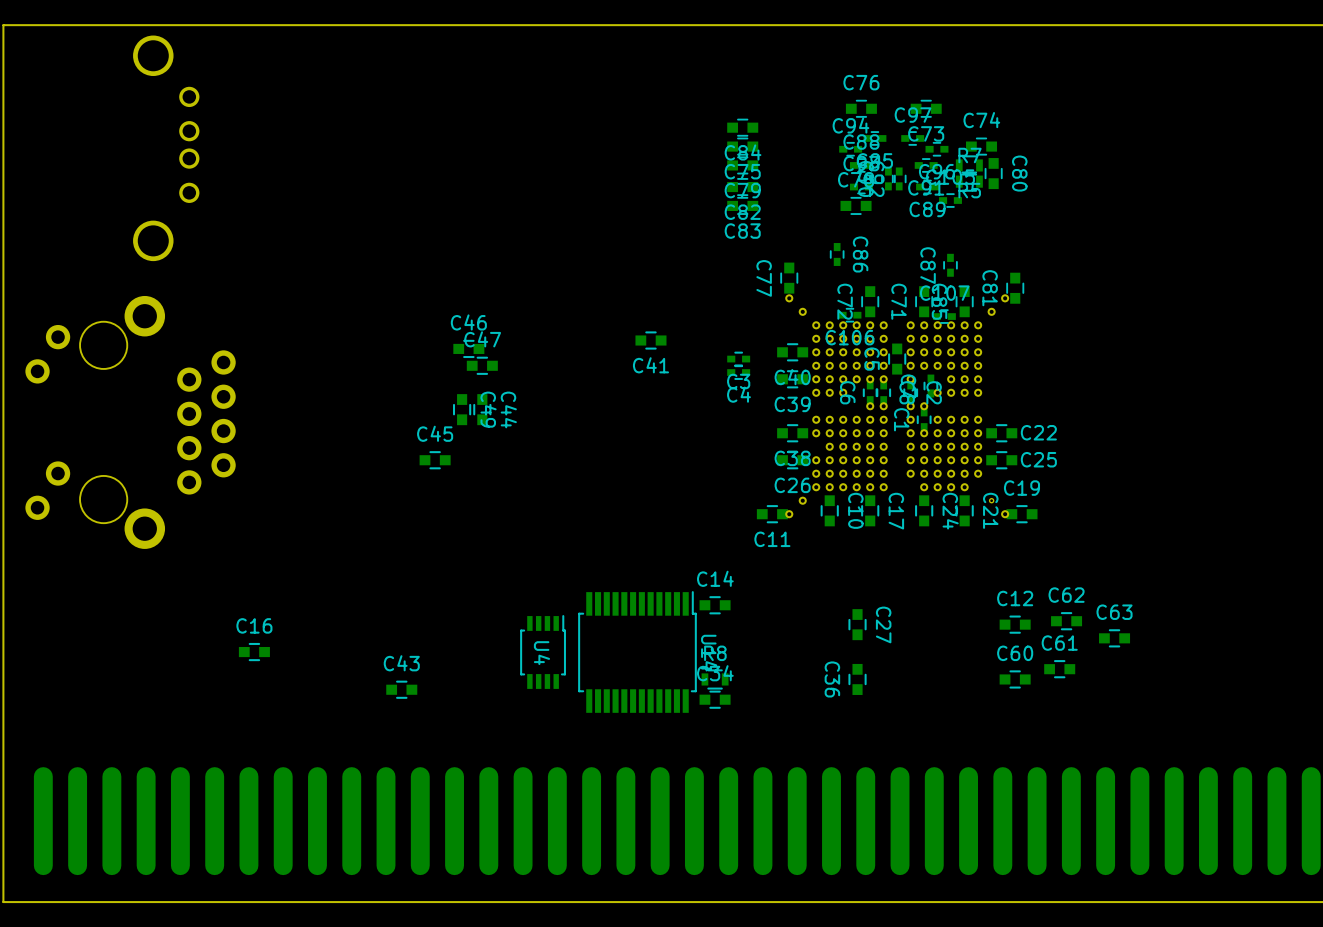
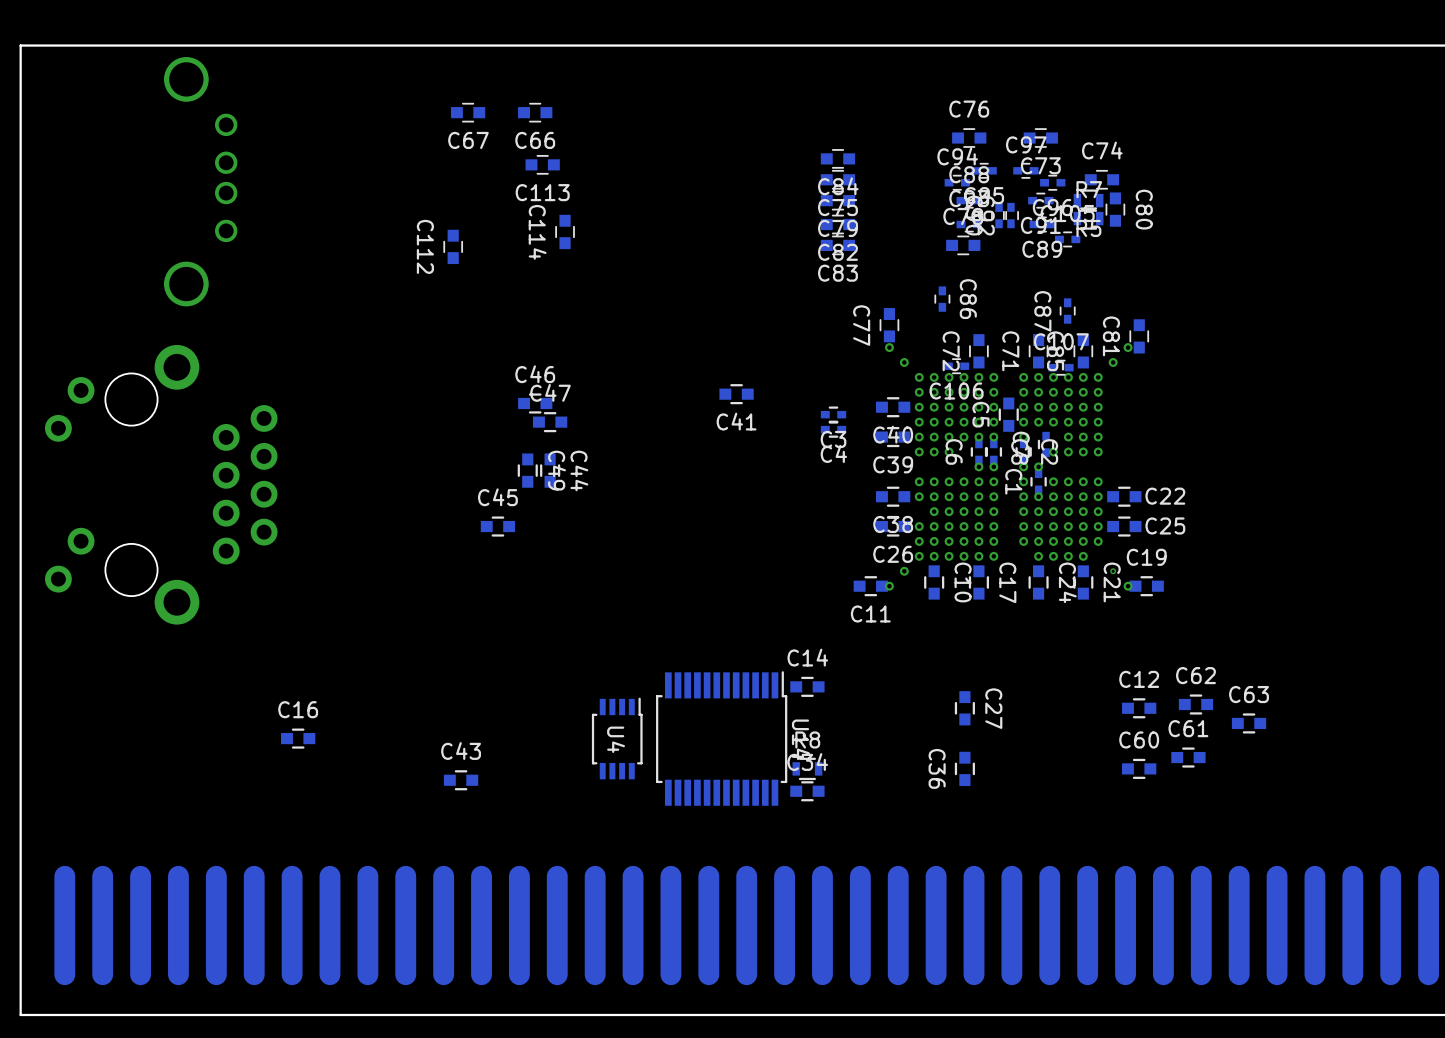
C67: none -> (468, 112)
C66: none -> (535, 112)
C113: none -> (542, 164)
C114: none -> (565, 231)
C112: none -> (453, 246)

